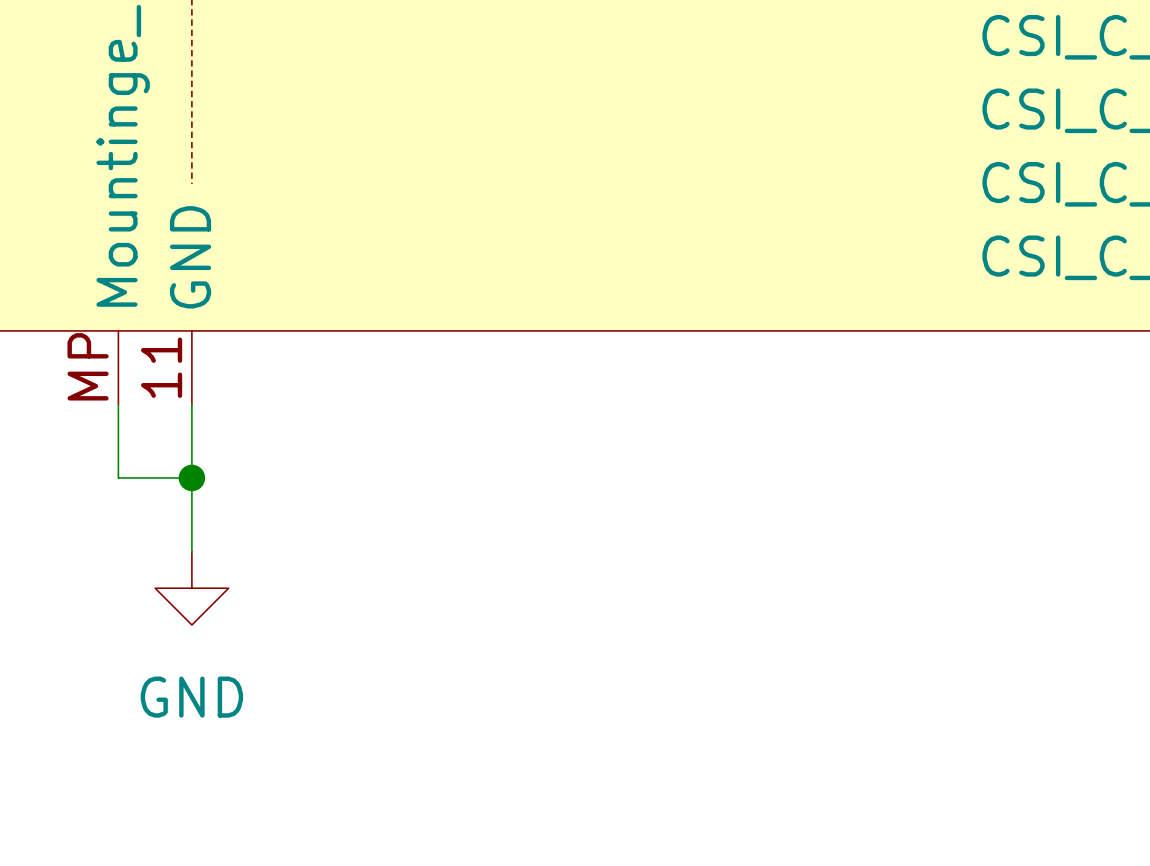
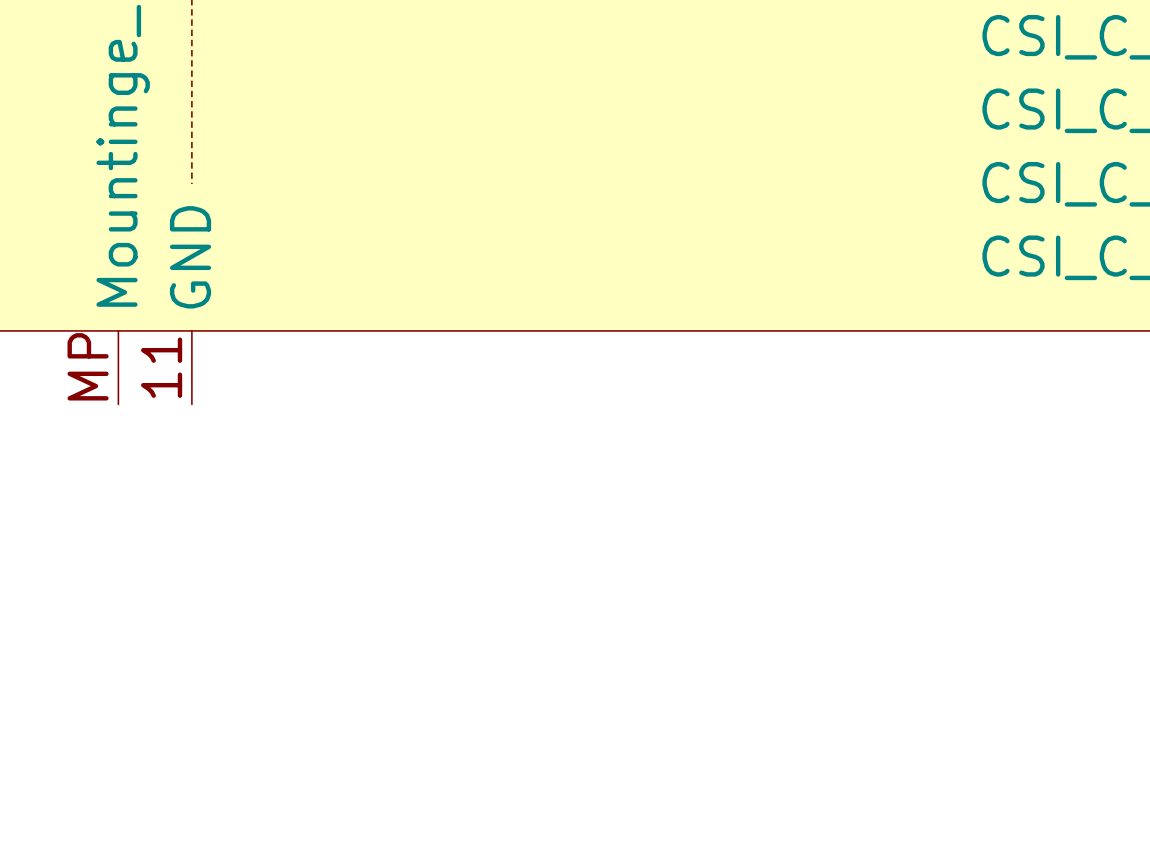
wire: (118, 404) (118, 477) (191, 477) -> none
wire: (191, 404) (191, 551) -> none
junction: (191, 477) -> none
power symbol: GND (191, 588) -> none

